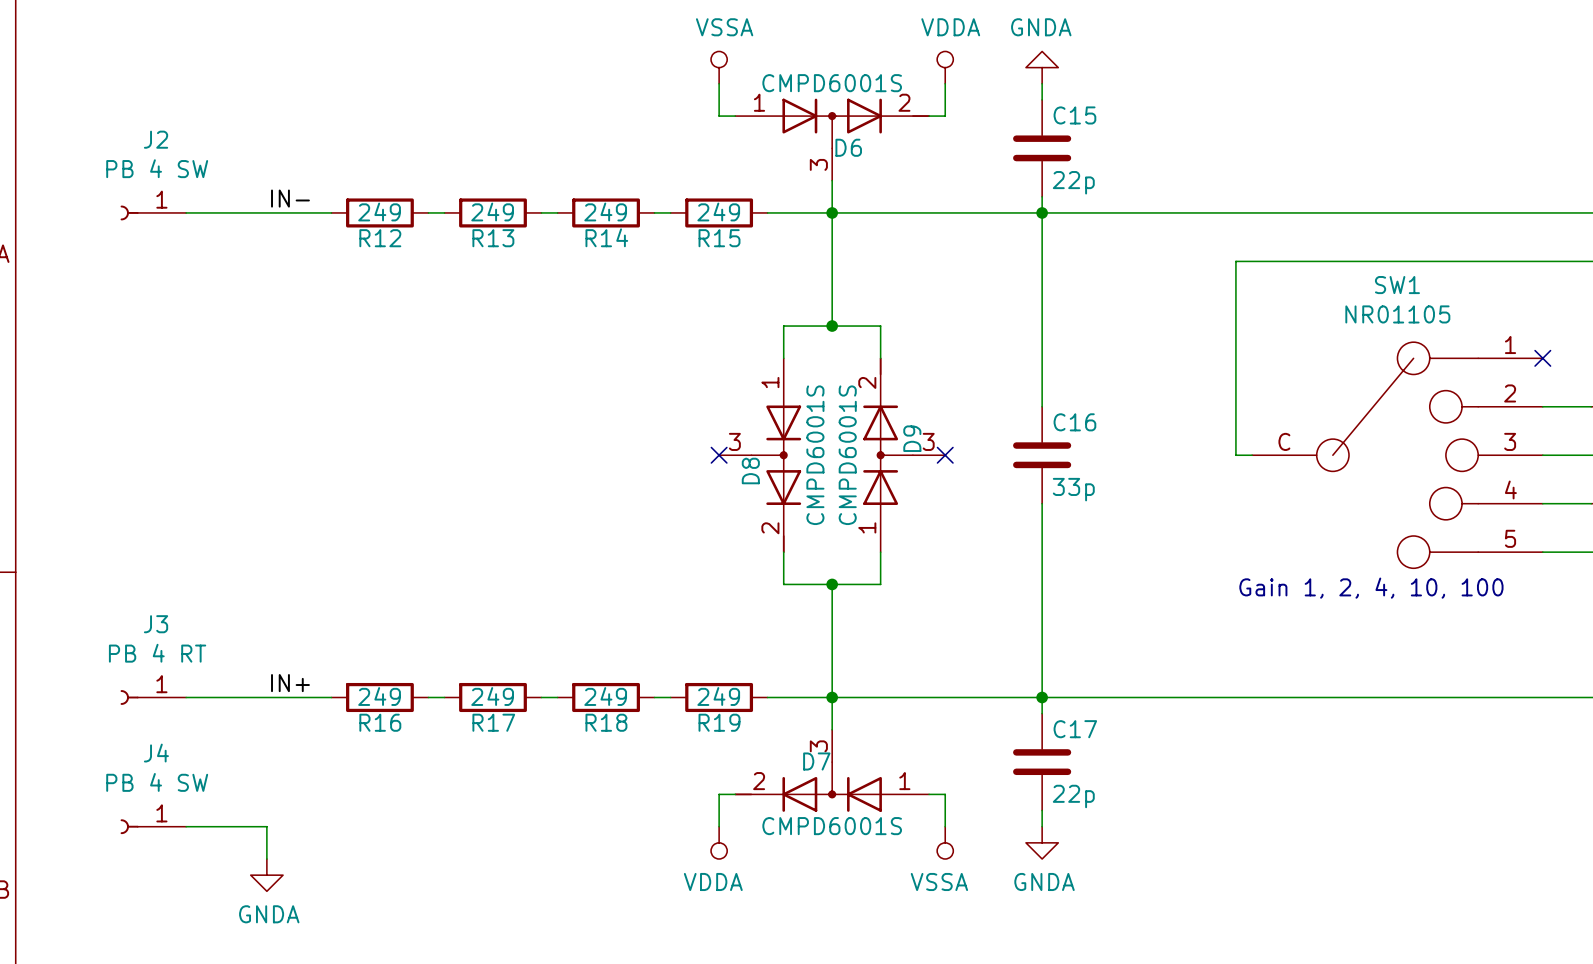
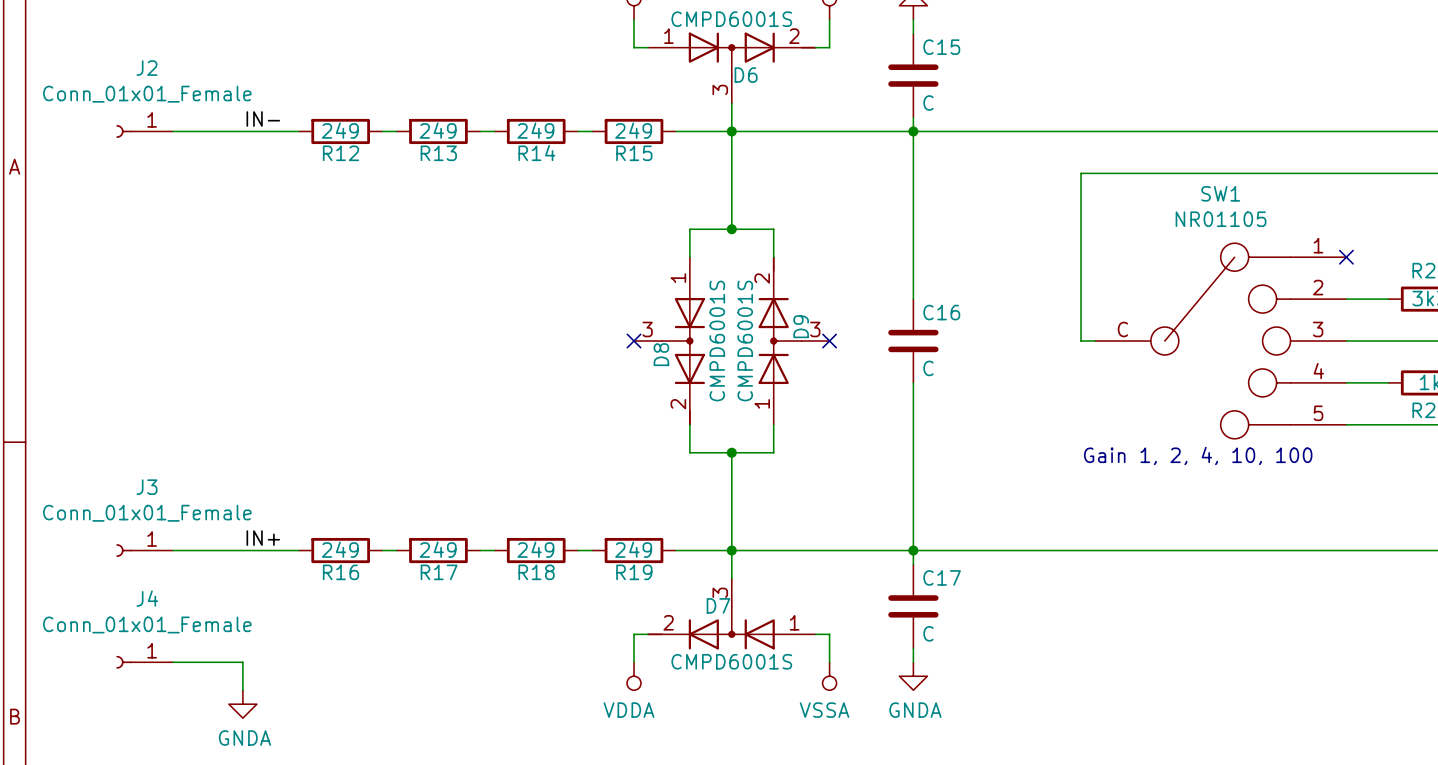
J2 value: PB 4 SW (157, 168) -> Conn_01x01_Female (147, 94)
C15 value: 22p (1073, 182) -> C (928, 103)
C16 value: 33p (1073, 489) -> C (928, 368)
J3 value: PB 4 RT (157, 653) -> Conn_01x01_Female (147, 513)
J4 value: PB 4 SW (157, 782) -> Conn_01x01_Female (147, 624)
C17 value: 22p (1073, 796) -> C (928, 633)

